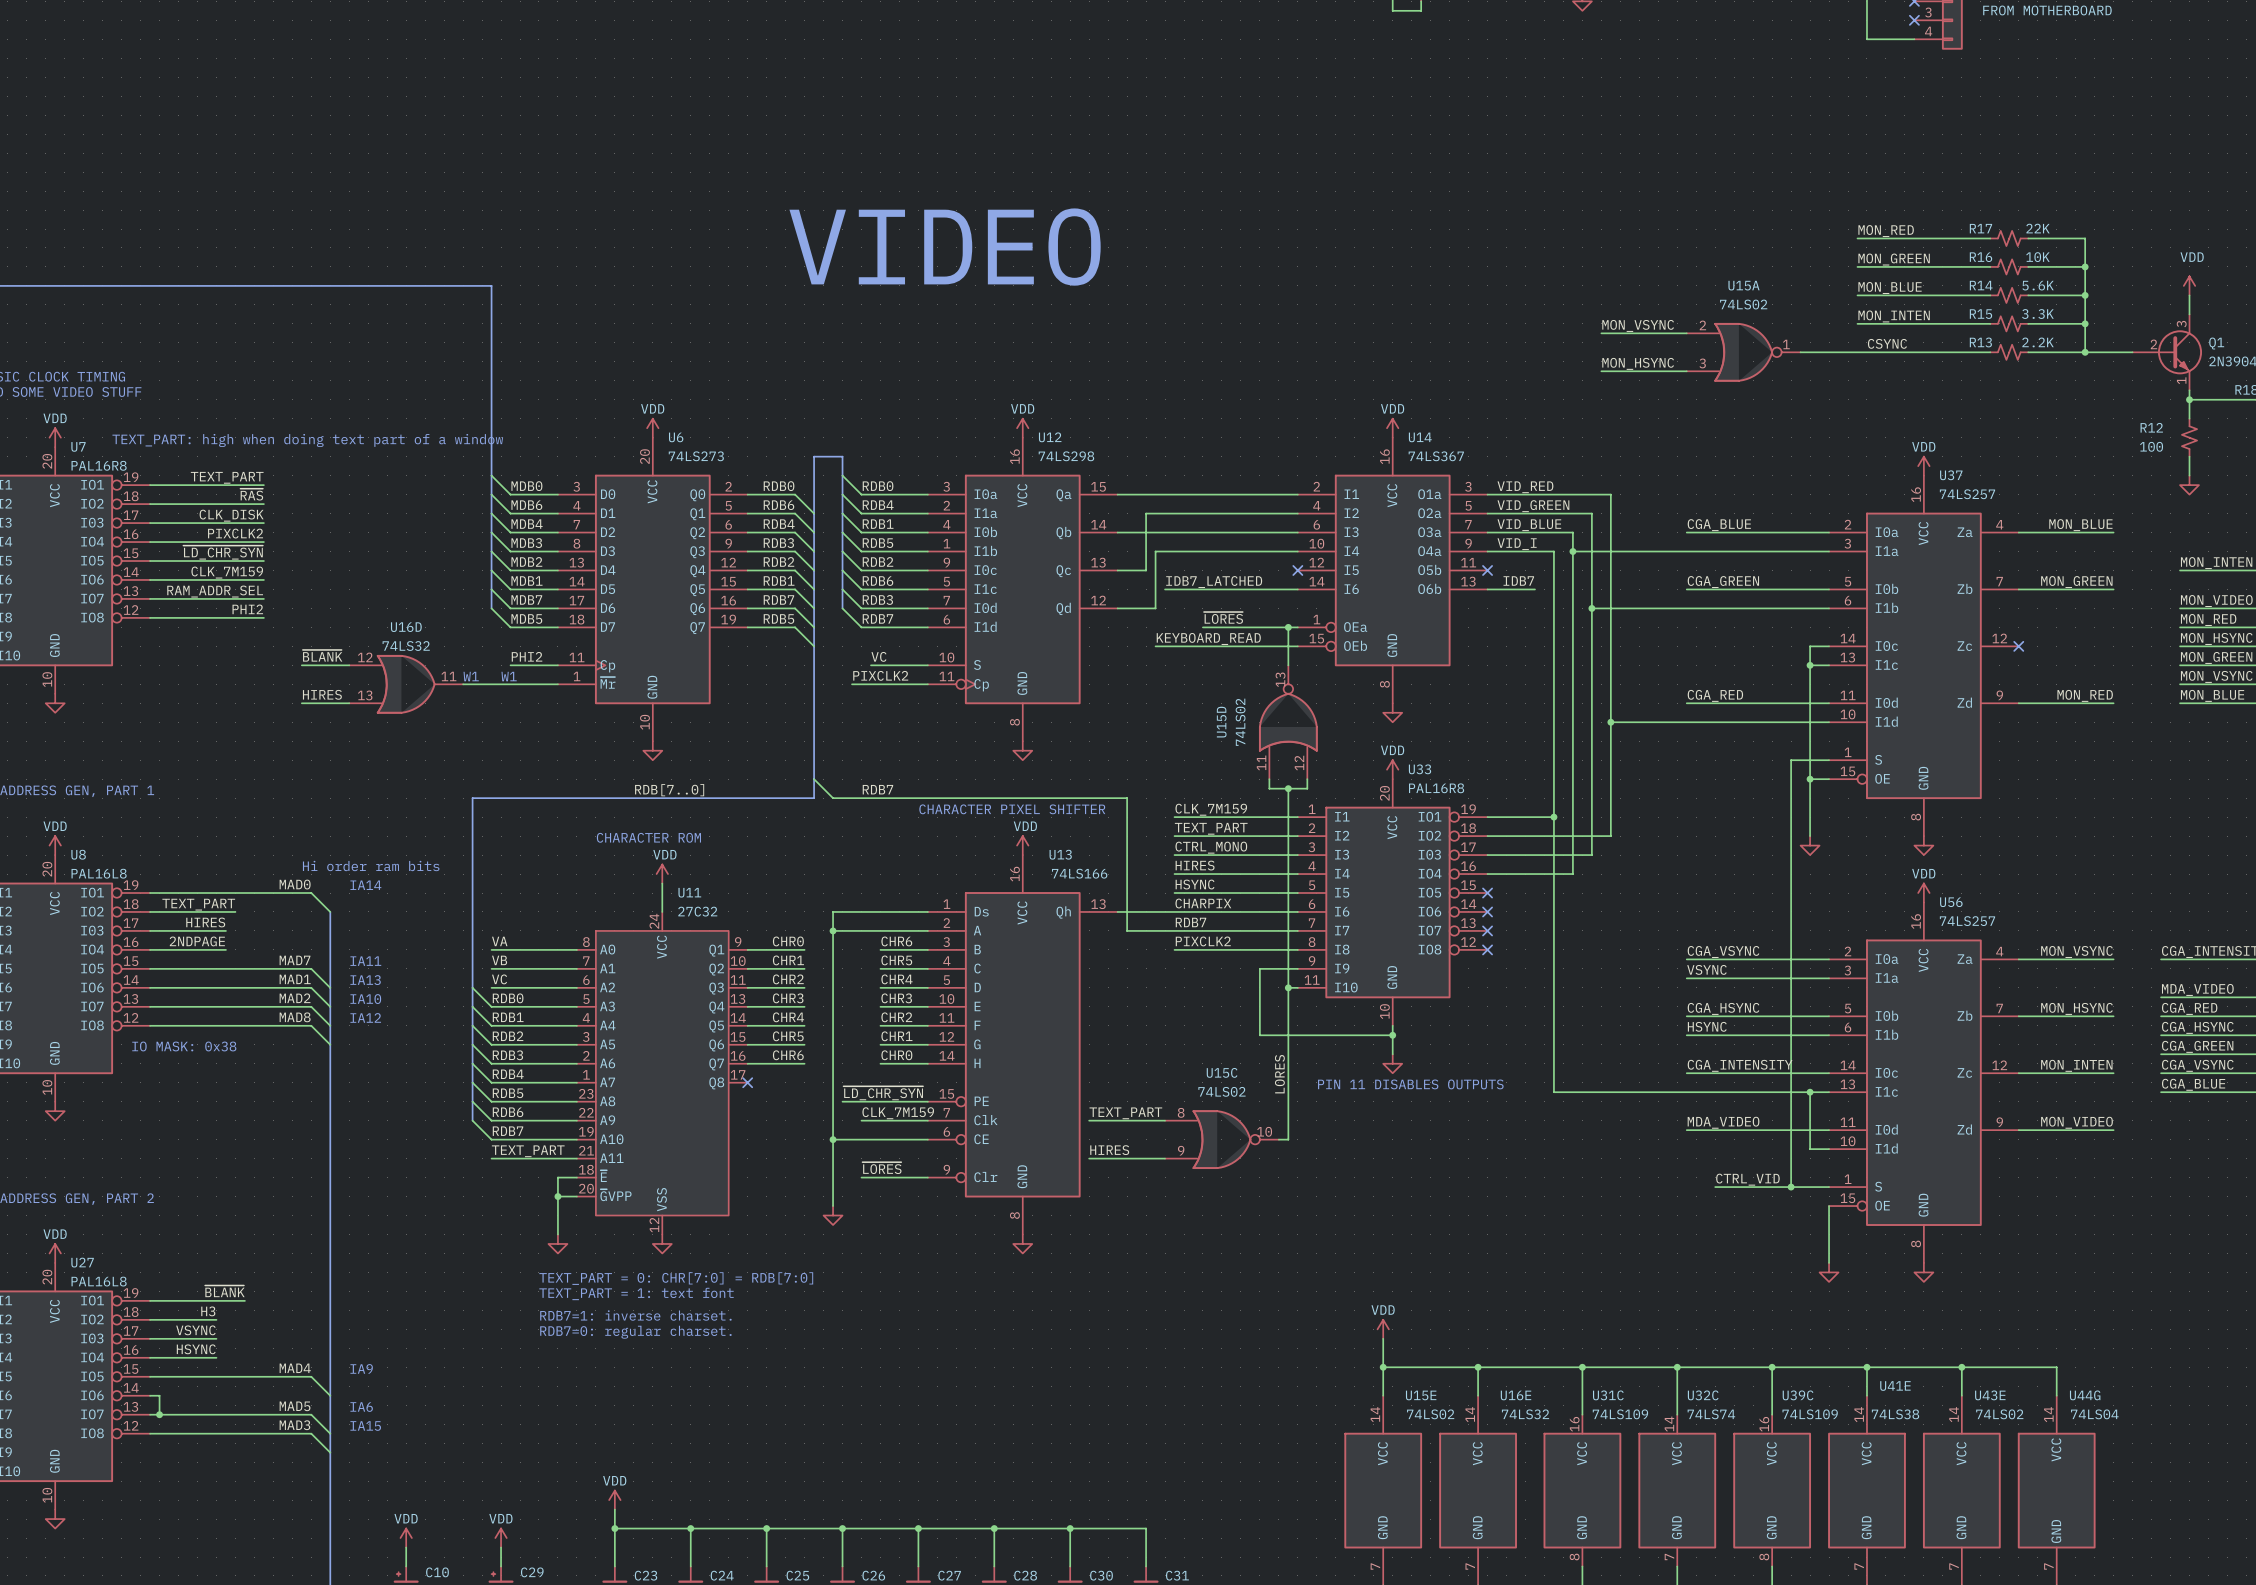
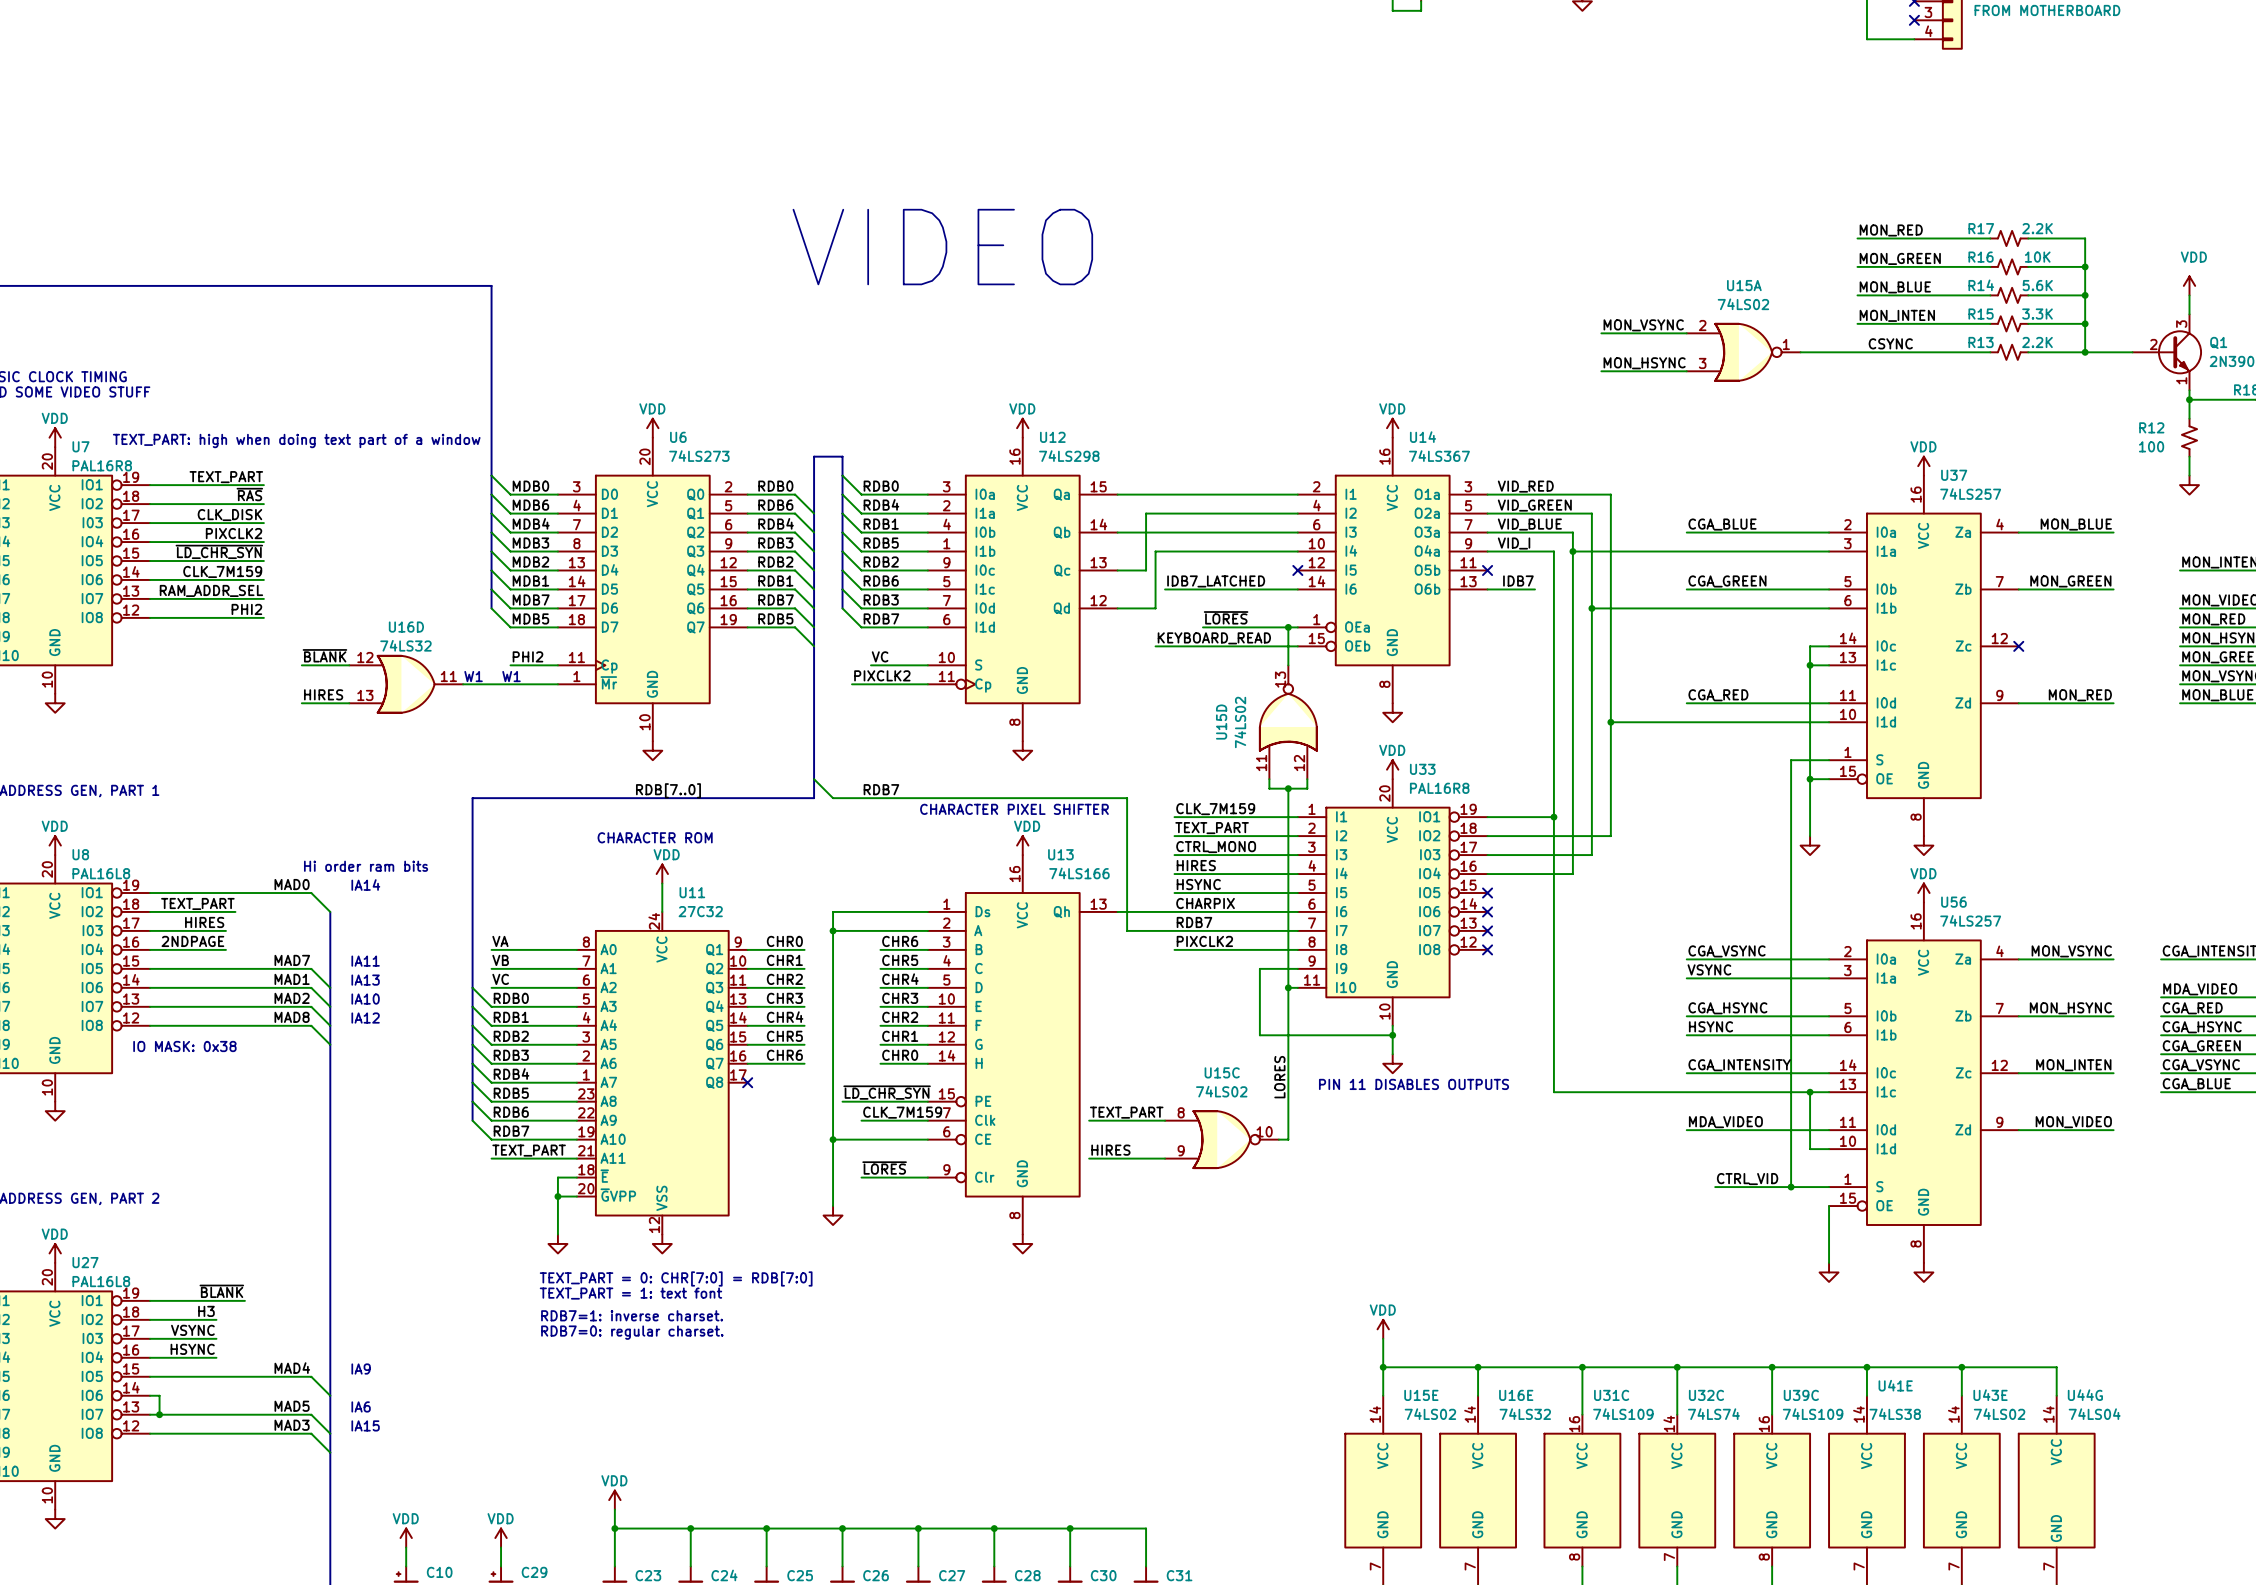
R17 value: 22K (2038, 228) -> 2.2K (2037, 228)

